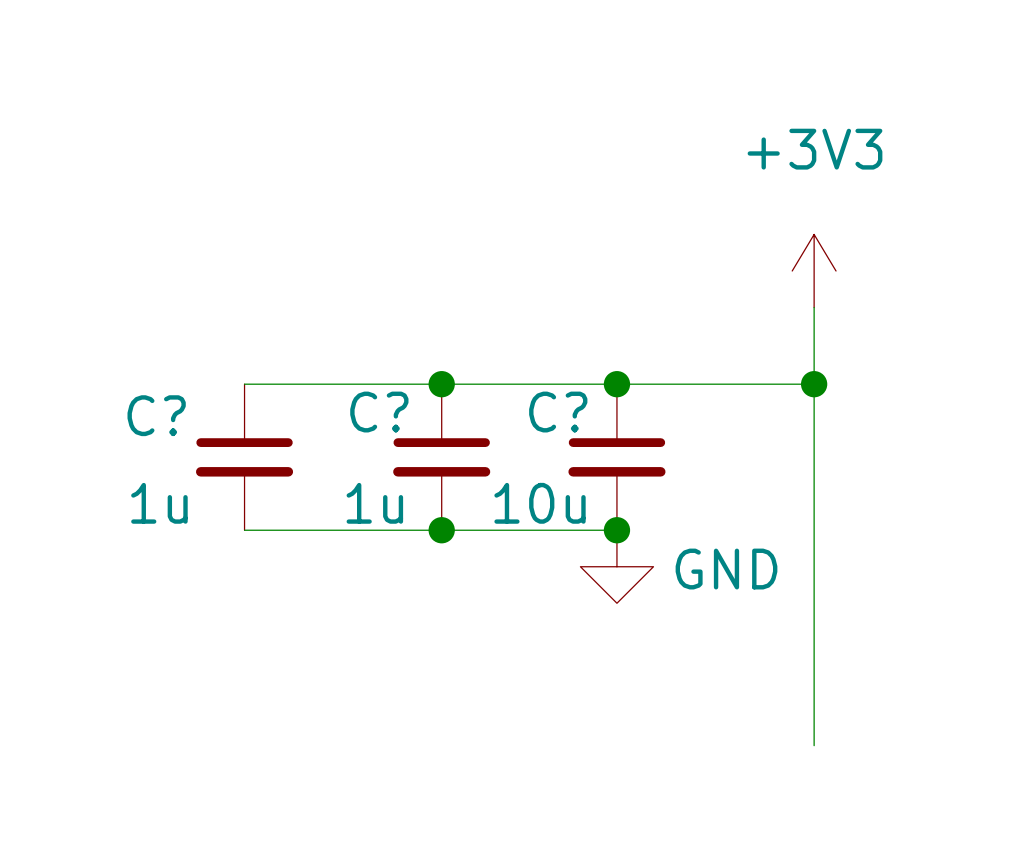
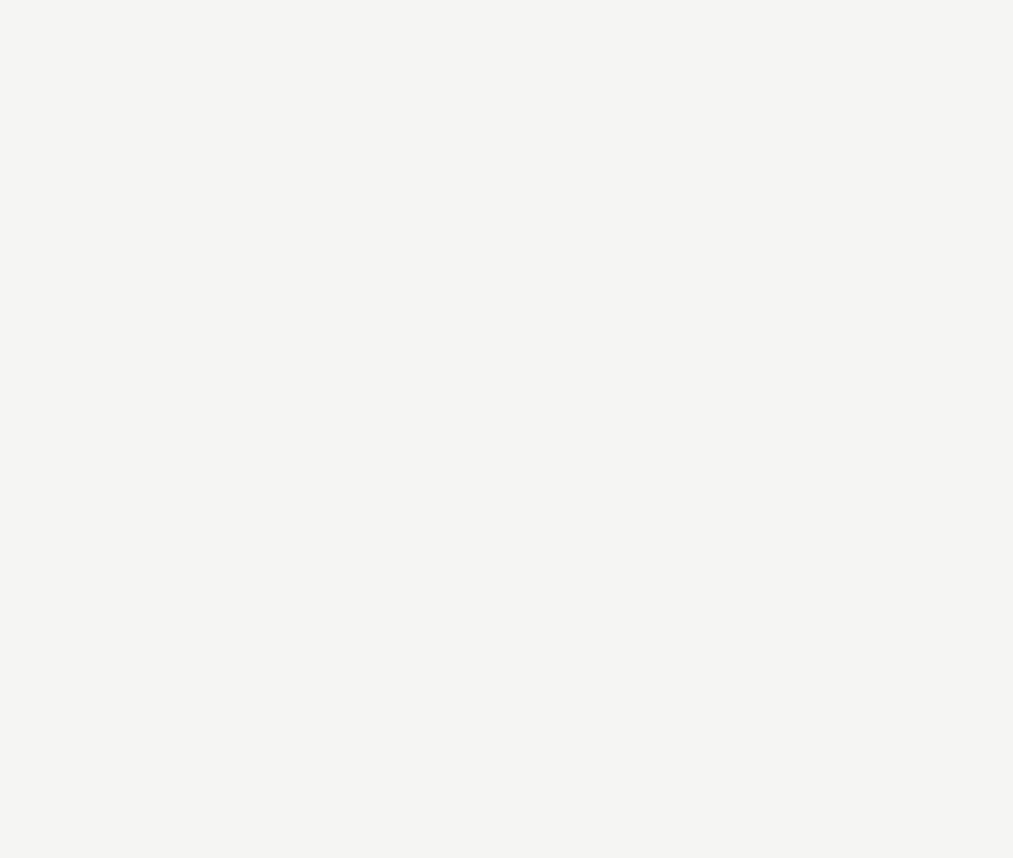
power symbol: +3V3 (814, 271) -> none
wire: (814, 307) (814, 745) -> none
wire: (244, 384) (814, 384) -> none
junction: (441, 384) -> none
junction: (616, 384) -> none
junction: (814, 384) -> none
C?: 1u (244, 457) -> none
C?: 1u (441, 457) -> none
C?: 10u (616, 457) -> none
wire: (244, 530) (616, 530) -> none
junction: (441, 530) -> none
junction: (616, 530) -> none
power symbol: GND (616, 566) -> none

